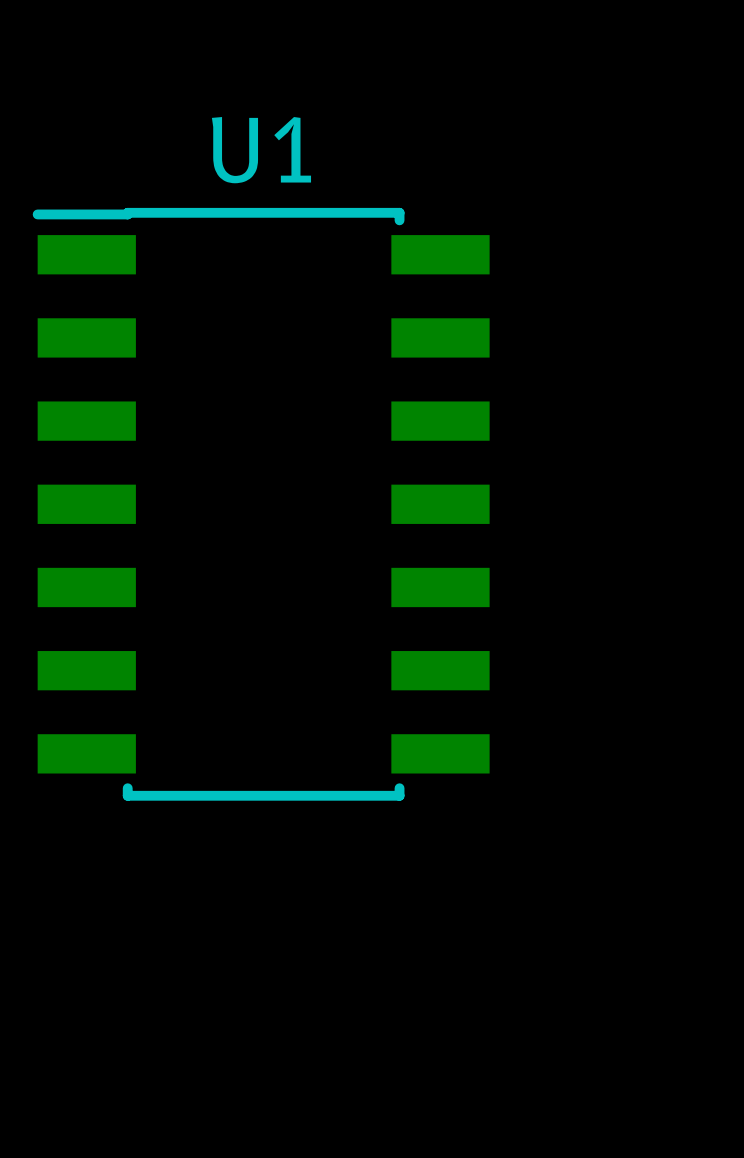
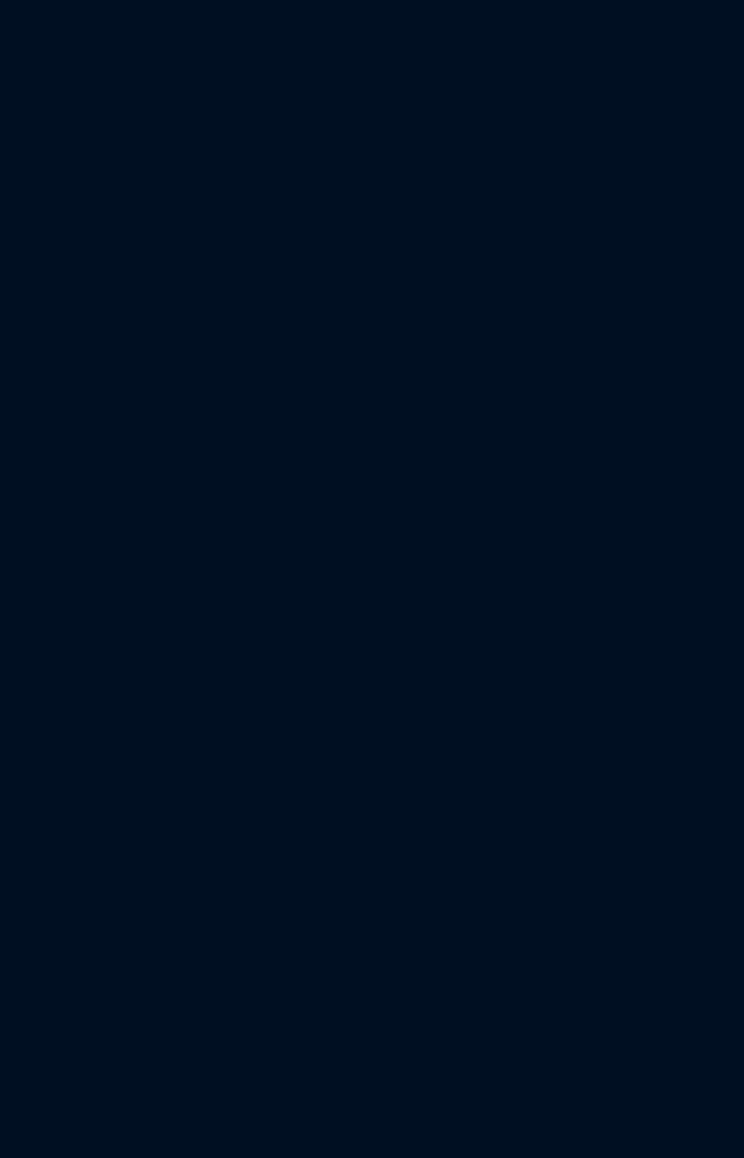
U1: (261, 504) -> none

